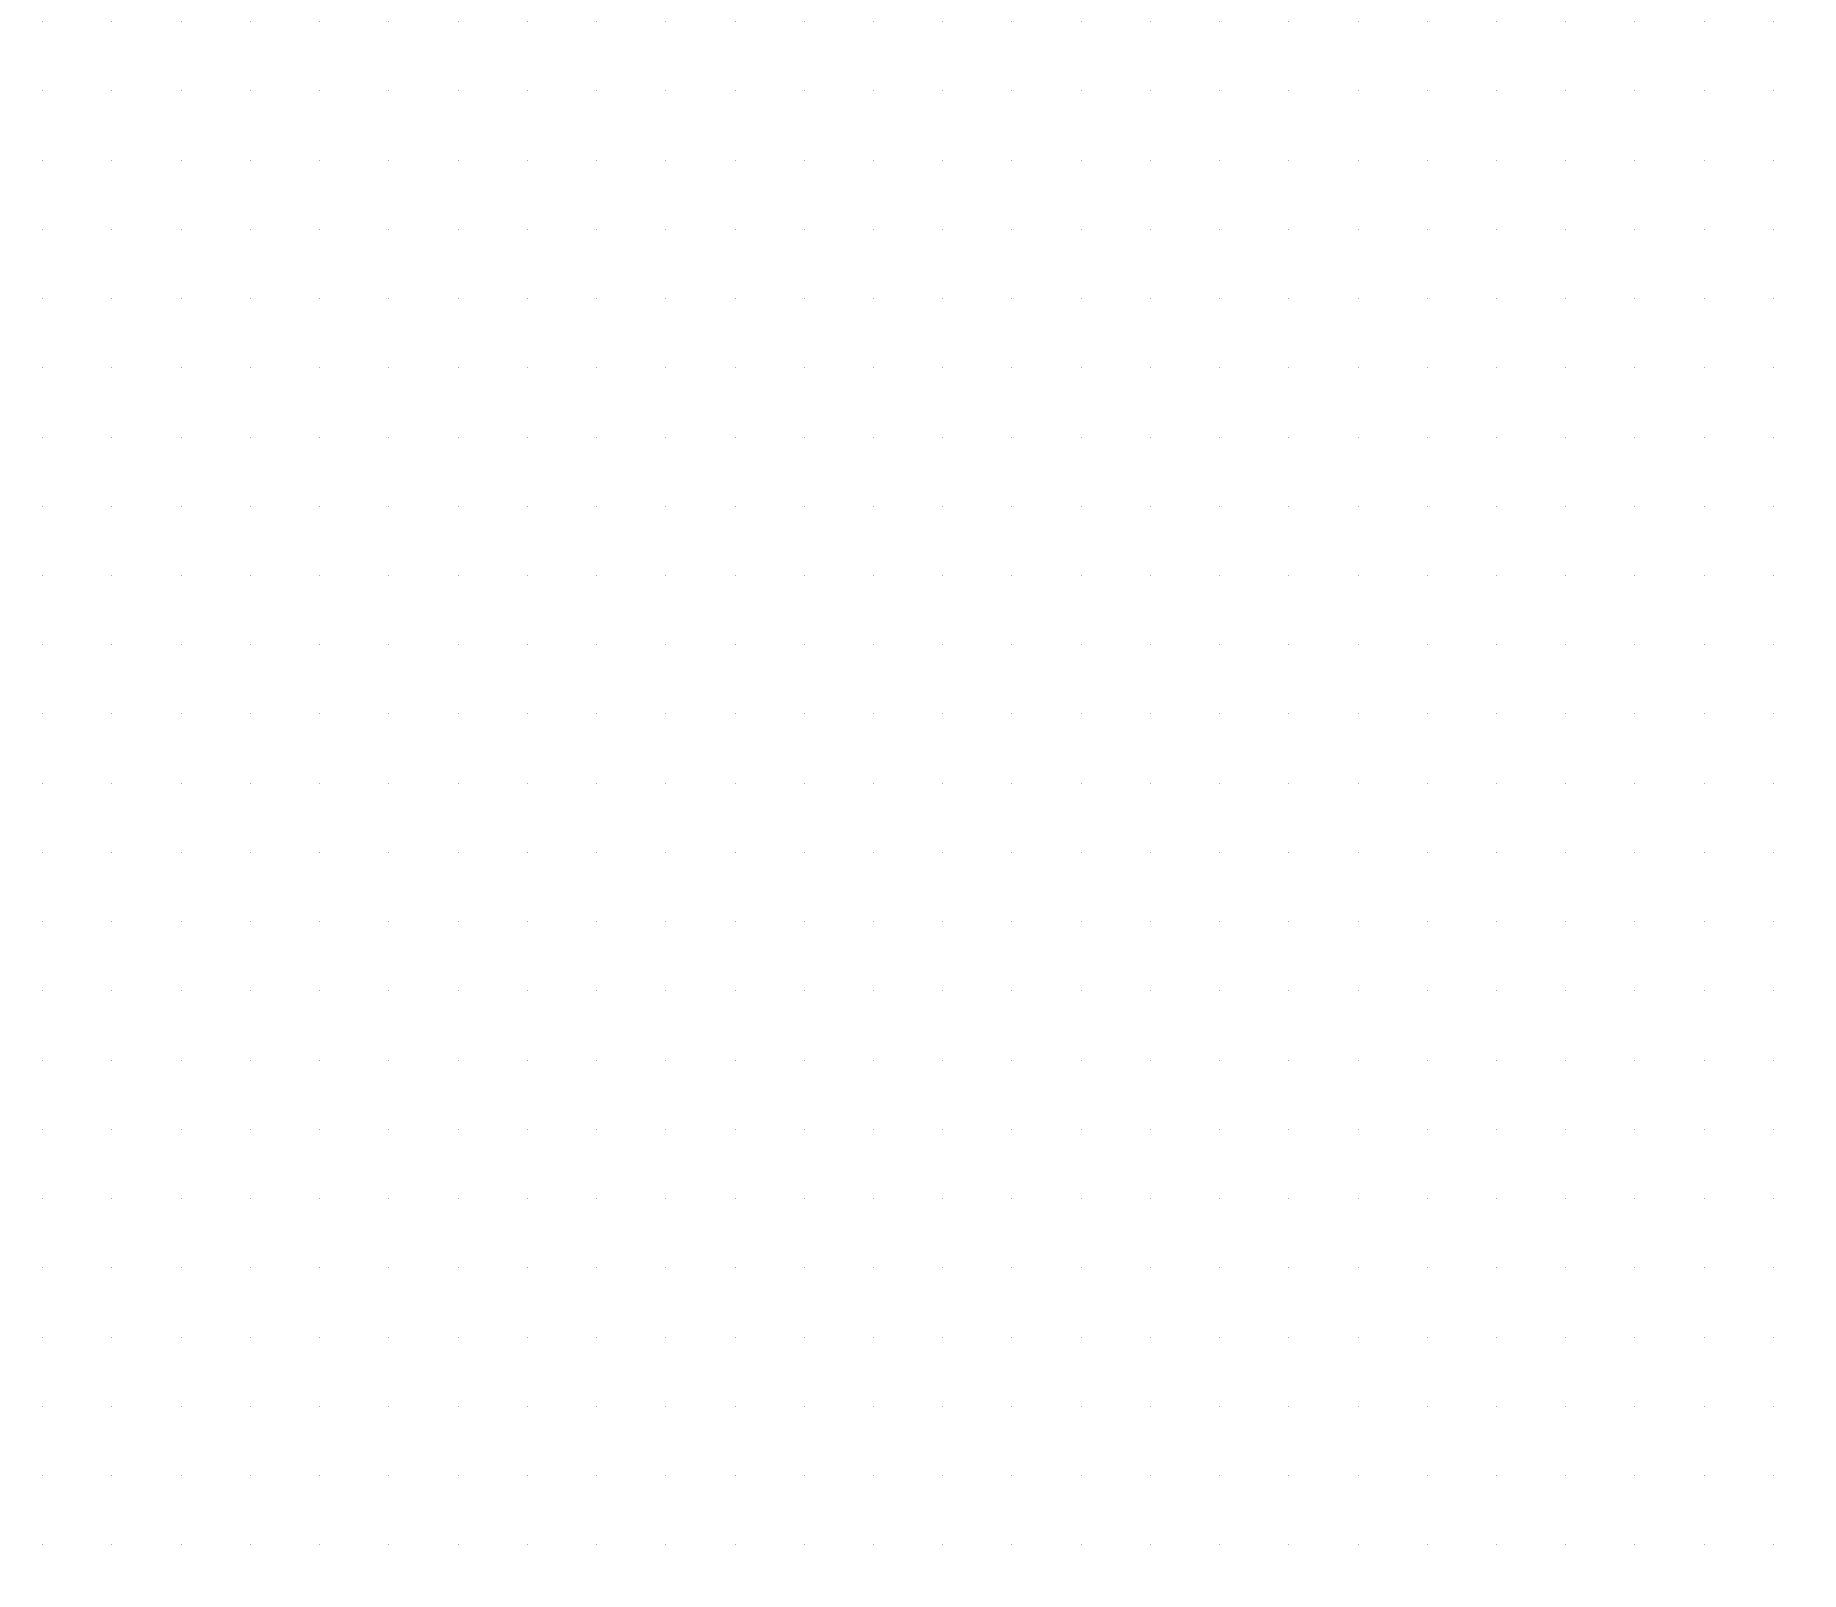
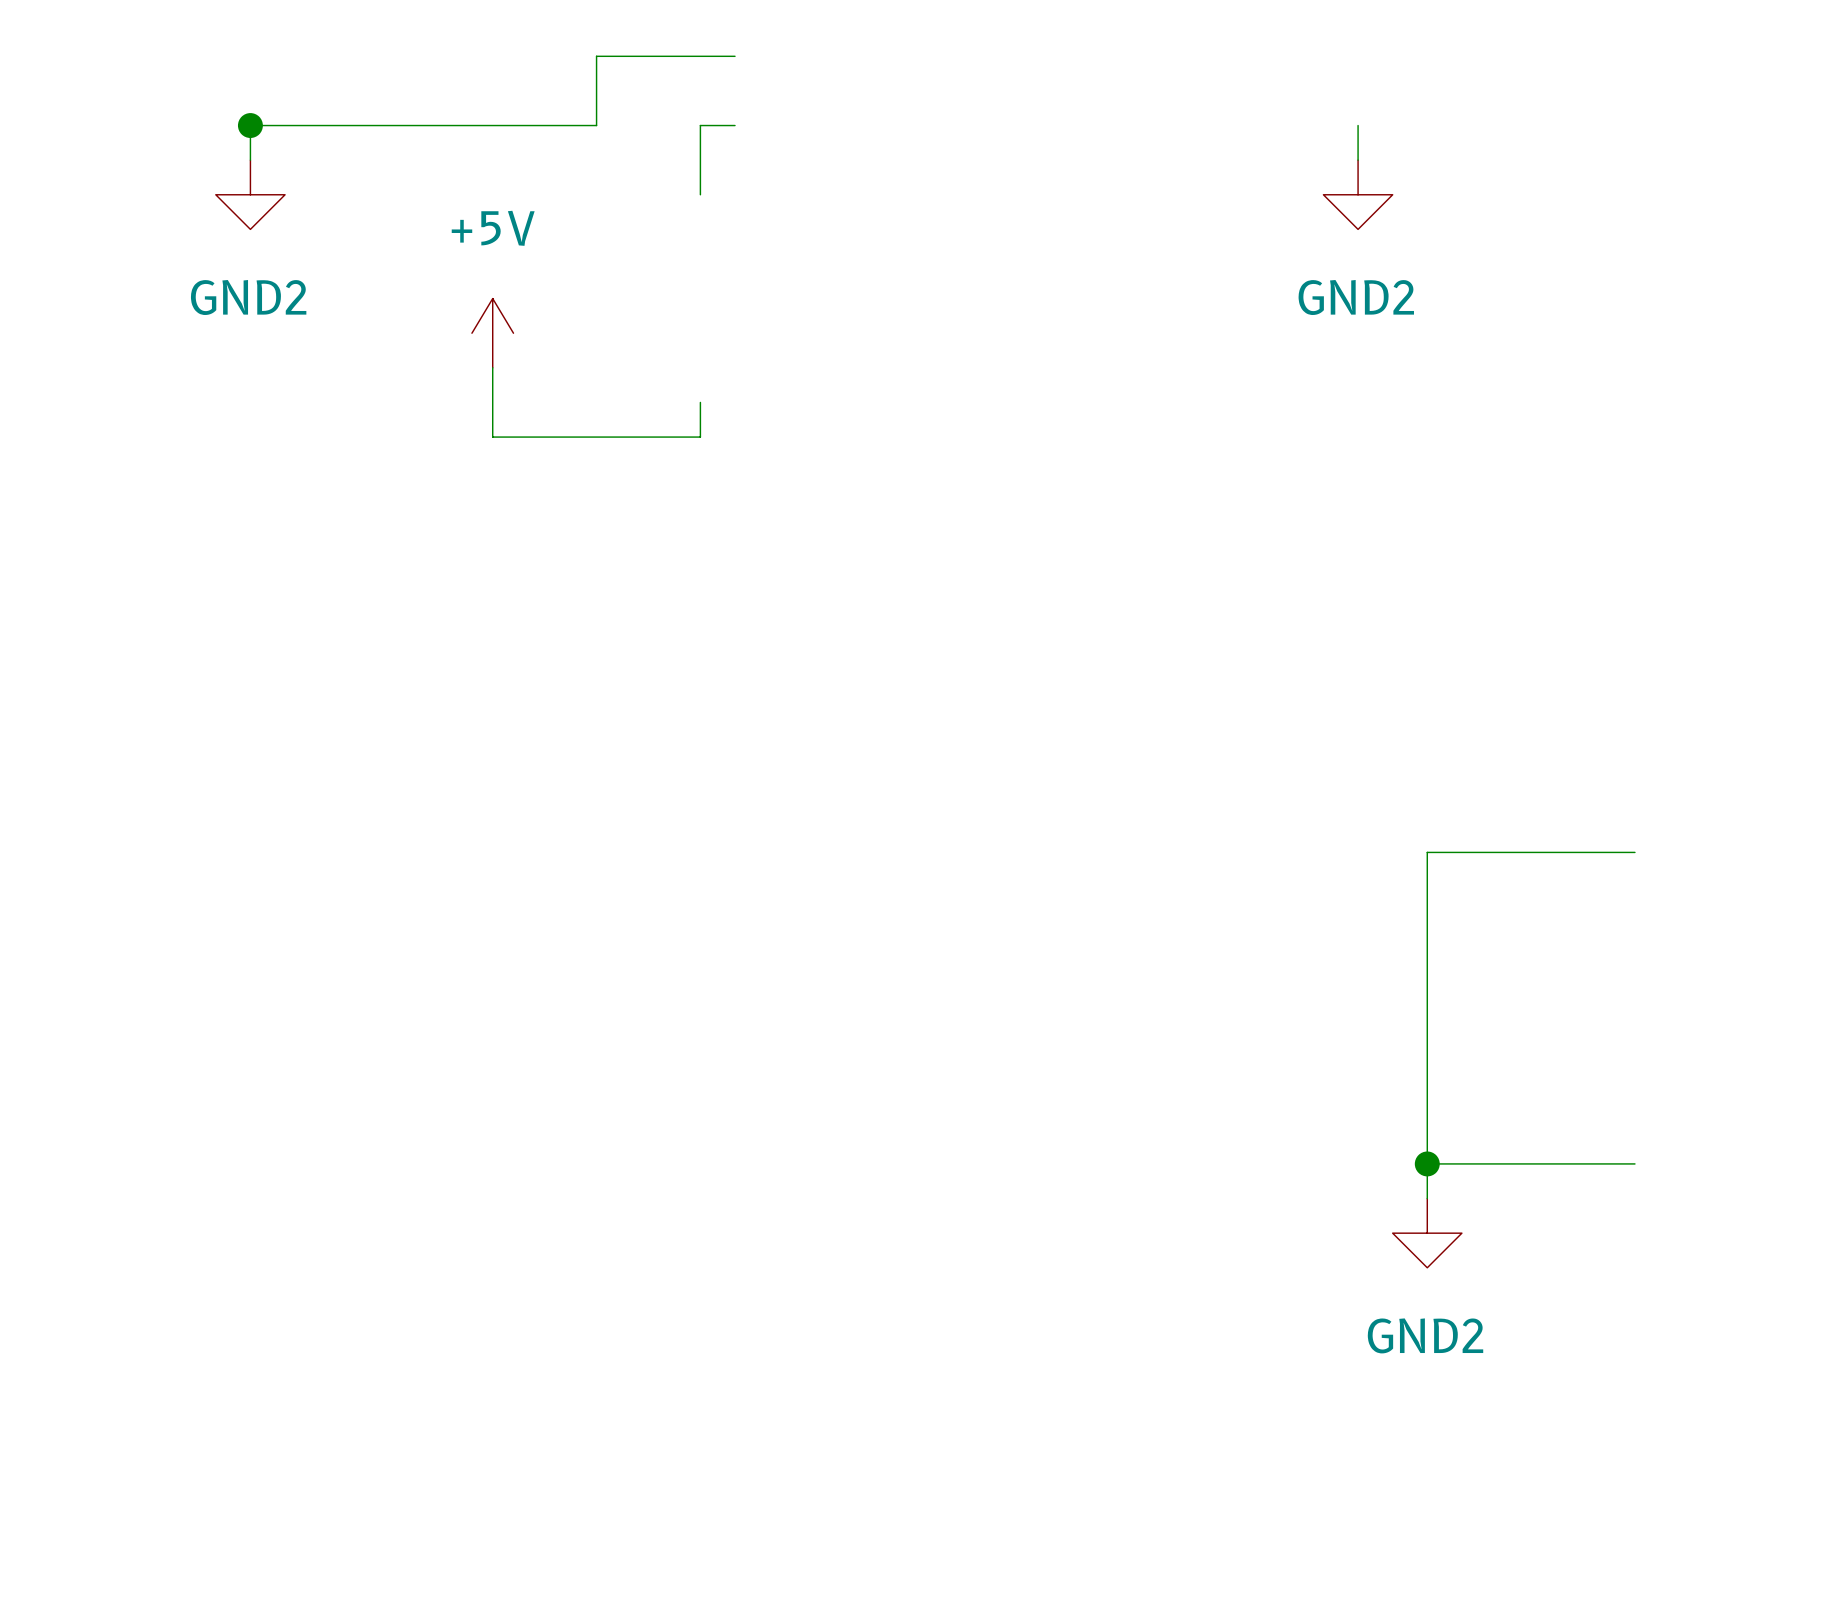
wire: none -> (735, 56) (596, 56) (596, 125) (250, 125) (250, 160)
junction: none -> (250, 125)
wire: none -> (735, 125) (700, 125) (700, 194)
wire: none -> (1358, 125) (1358, 160)
power symbol: none -> GND2 (250, 194)
power symbol: none -> GND2 (1358, 194)
power symbol: none -> +5V (492, 333)
wire: none -> (492, 367) (492, 437) (700, 437) (700, 402)
wire: none -> (1634, 852) (1427, 852) (1427, 1198)
wire: none -> (1427, 1163) (1634, 1163)
junction: none -> (1427, 1163)
power symbol: none -> GND2 (1427, 1233)

